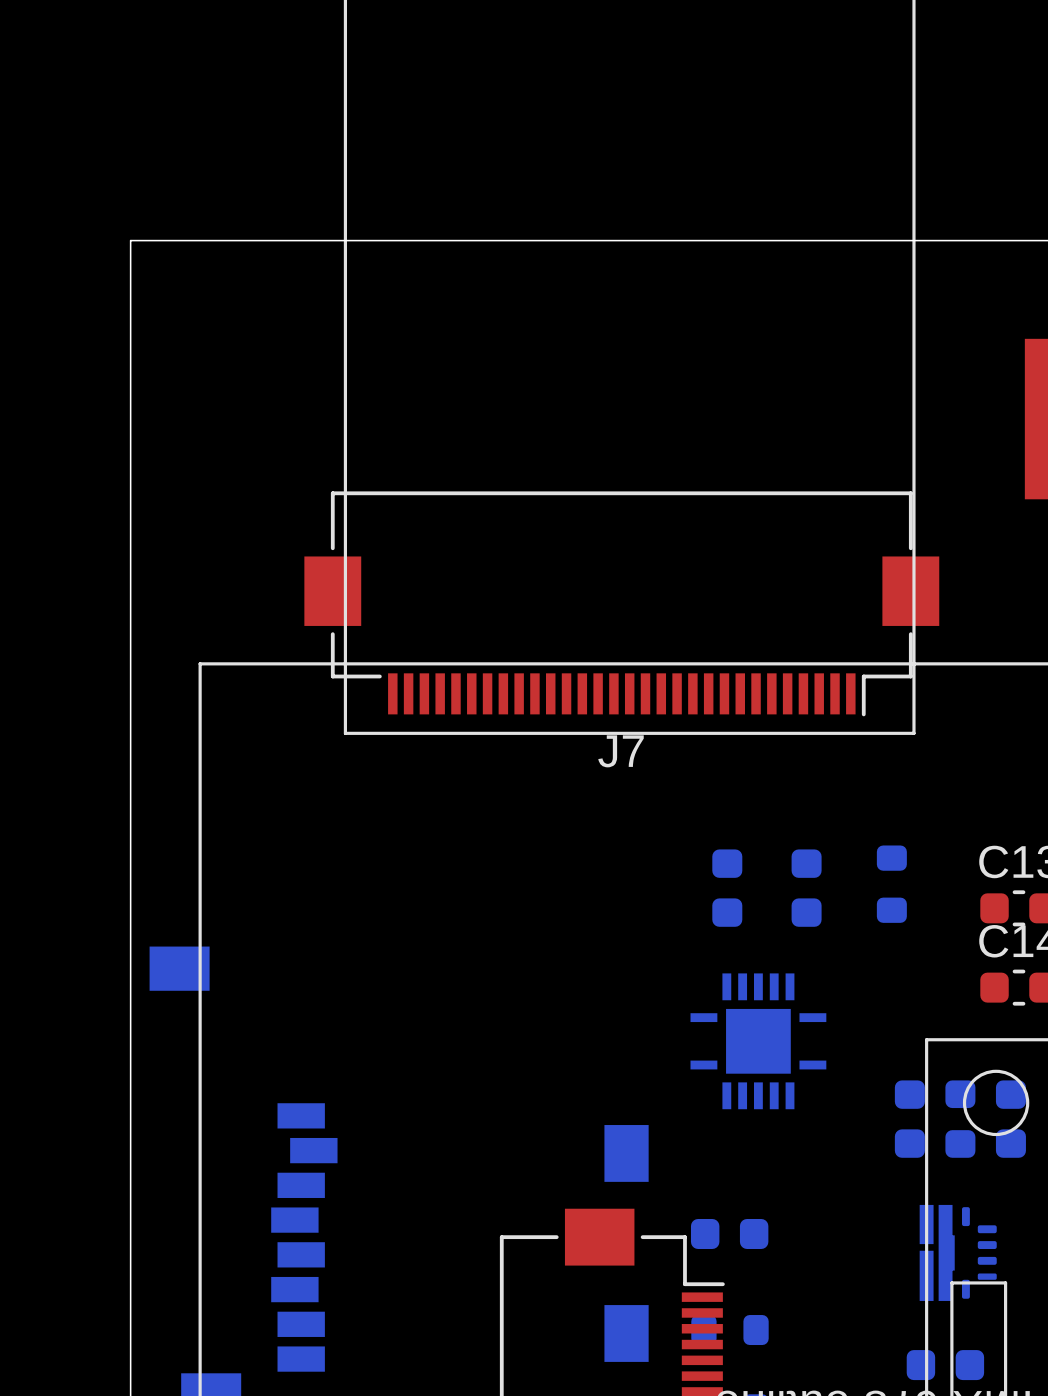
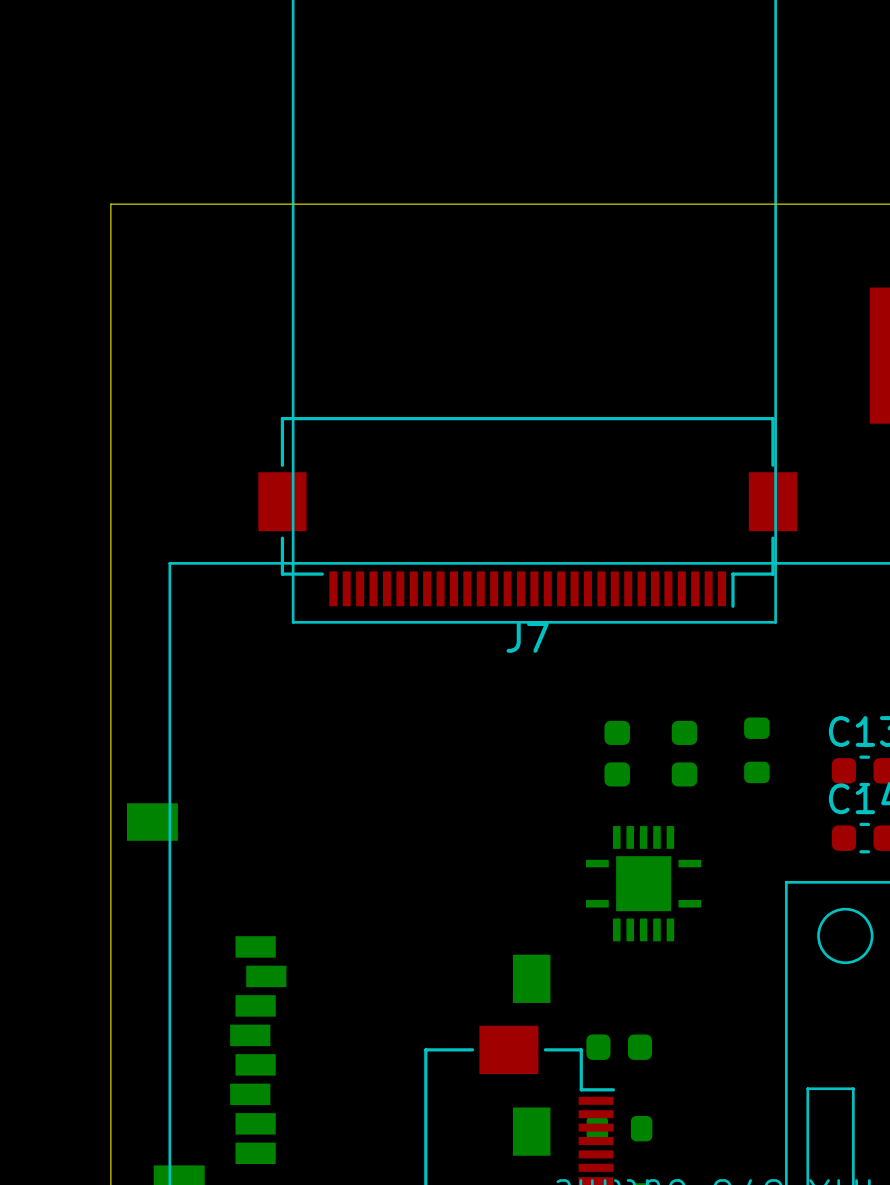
part: (909, 1119) -> none
part: (960, 1119) -> none
part: (1010, 1119) -> none
part: (958, 1252) -> none
part: (945, 1365) -> none

